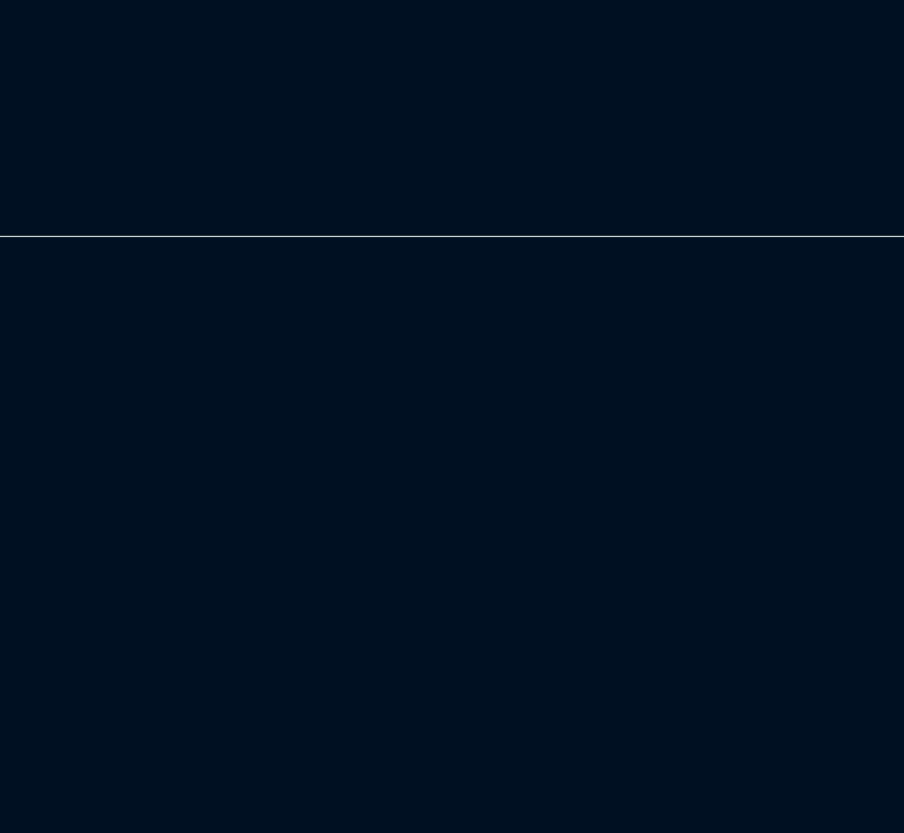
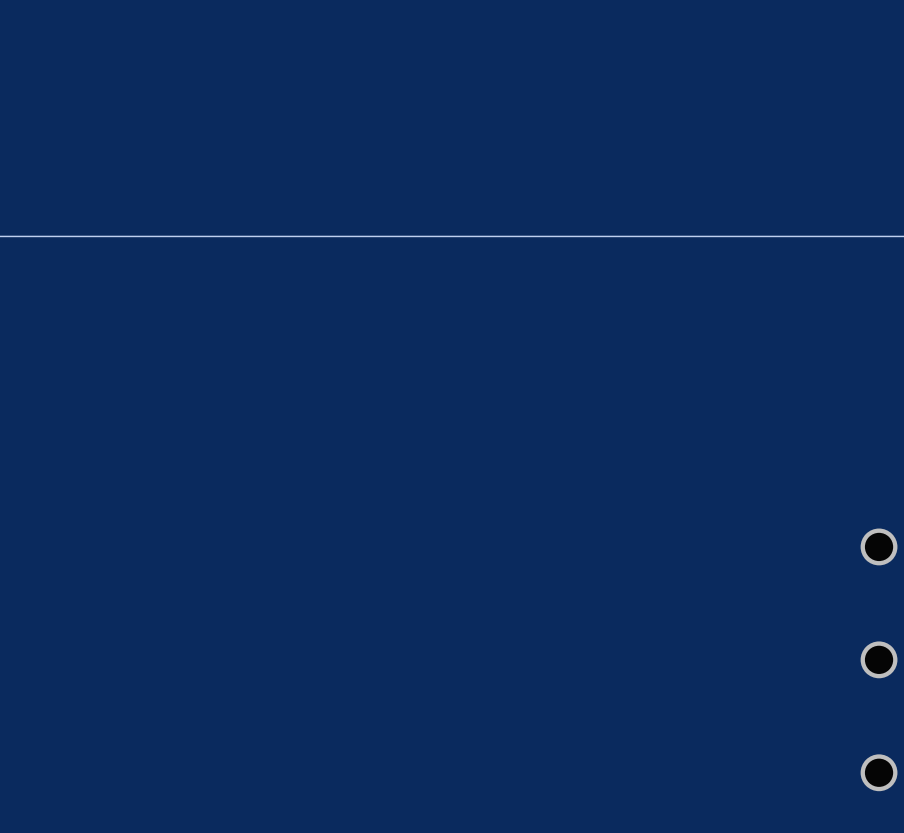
via: none -> (879, 546)
via: none -> (879, 659)
via: none -> (879, 772)

